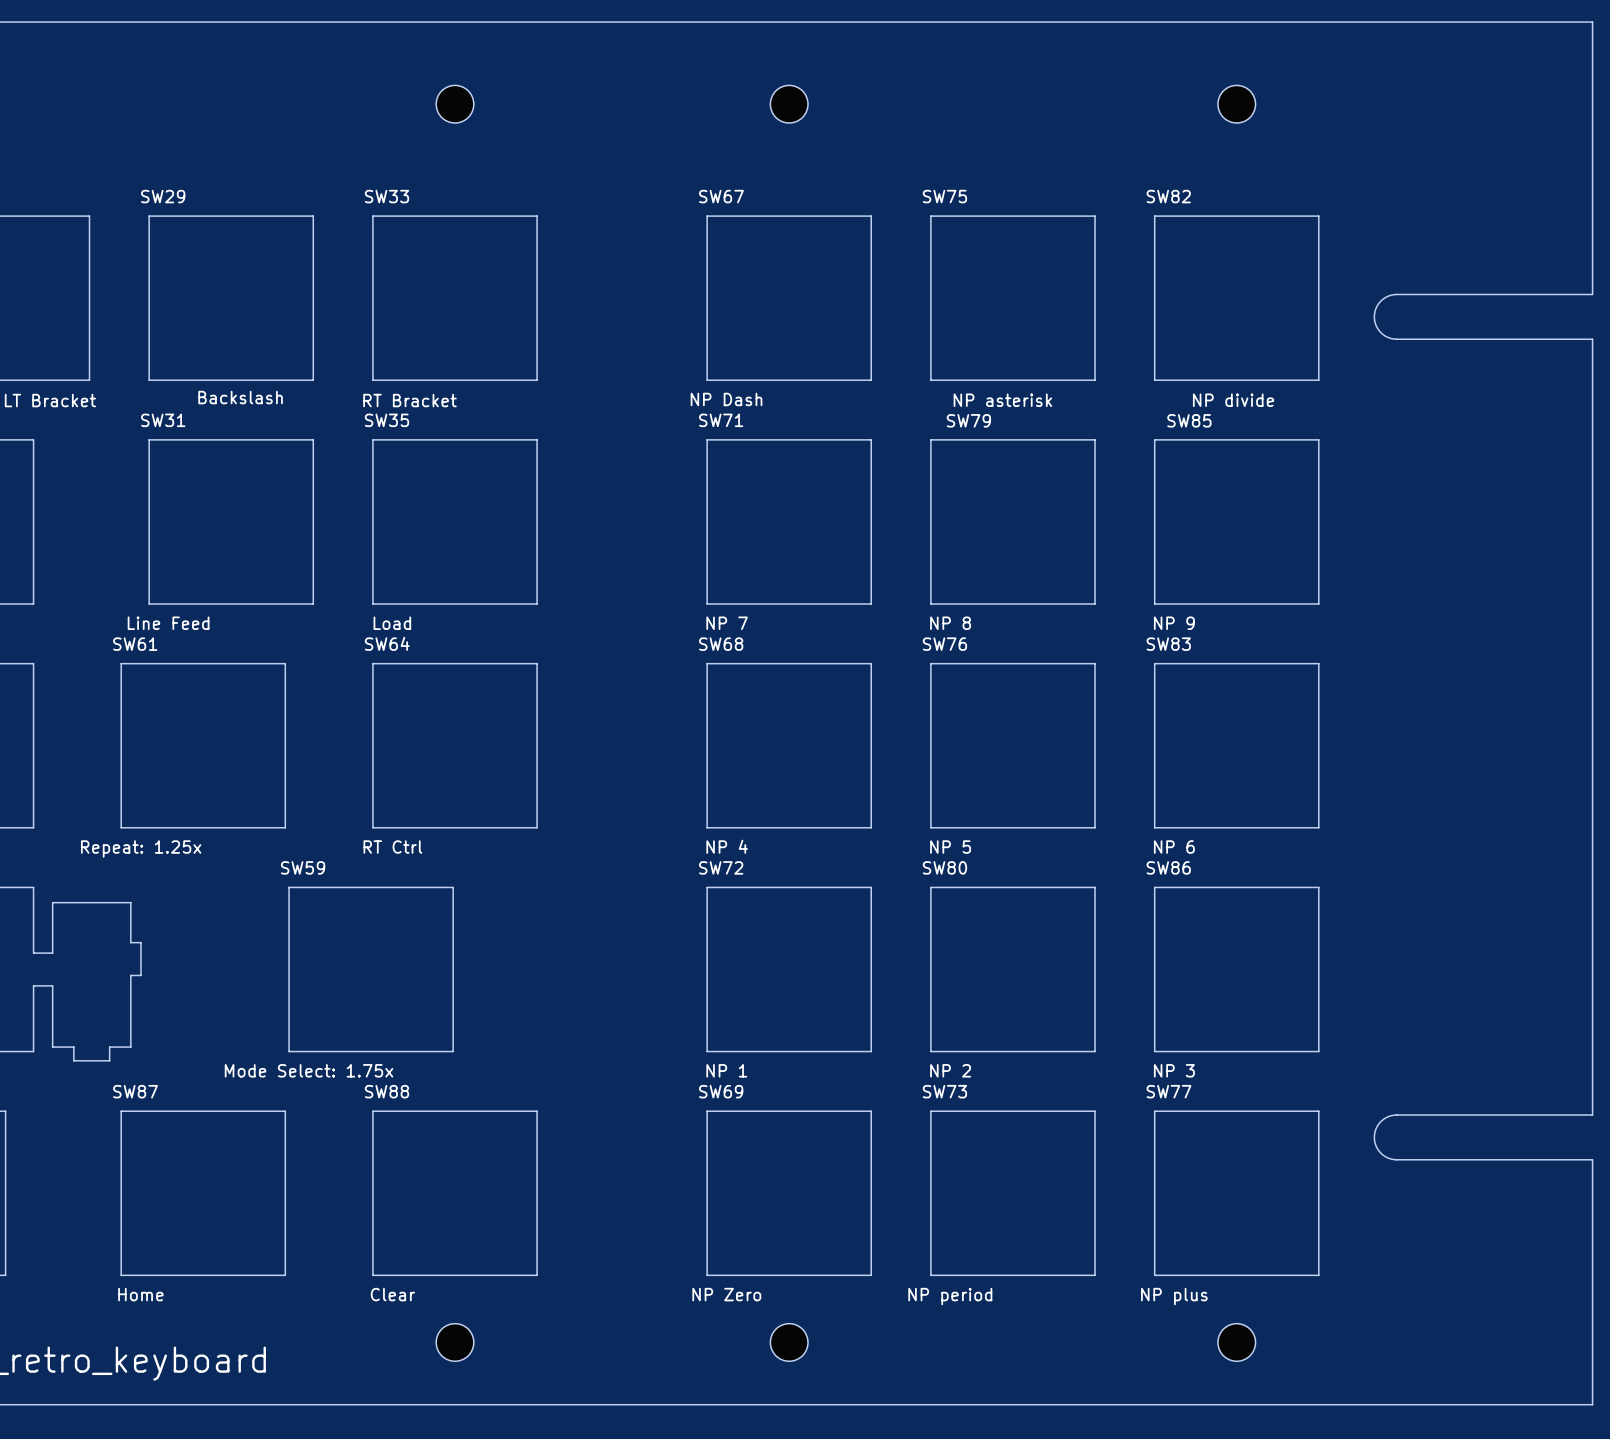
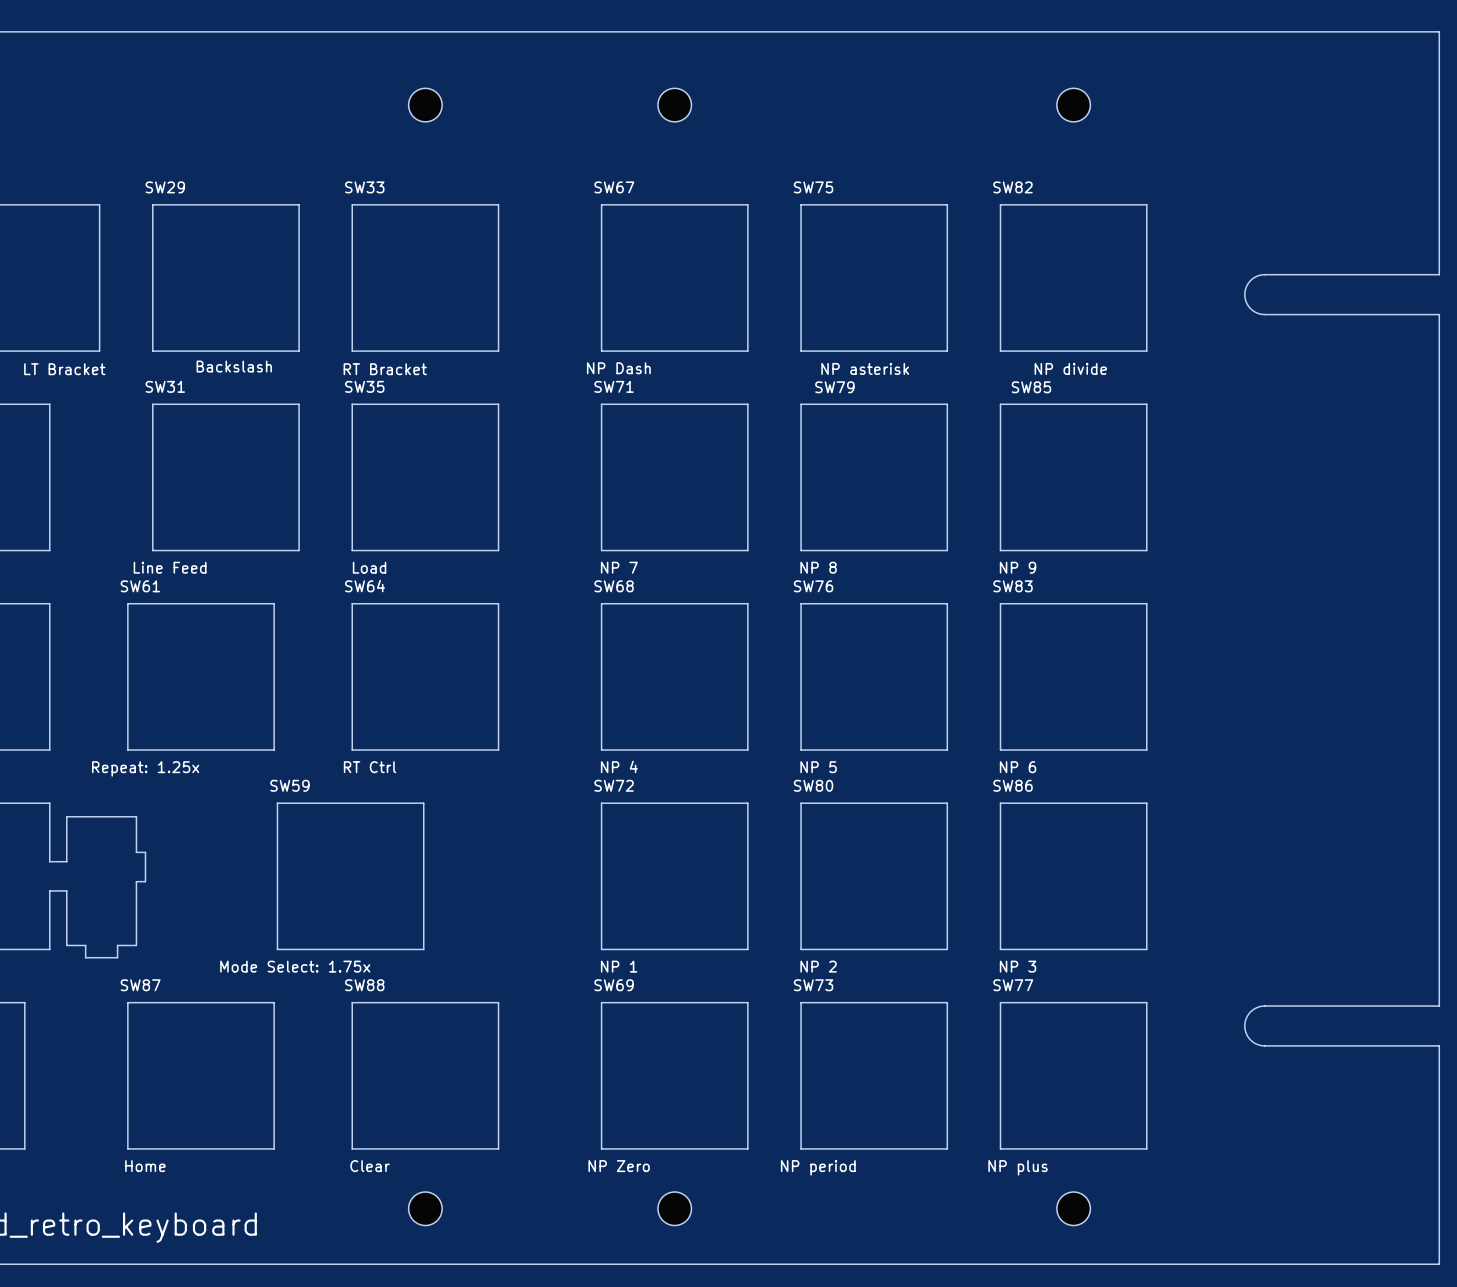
part position: (789, 104) -> (674, 105)
part position: (1236, 104) -> (1073, 105)
SW67 position: (789, 298) -> (674, 277)
SW75 position: (1012, 298) -> (874, 277)
SW82 position: (1236, 298) -> (1073, 277)
SW71 position: (789, 521) -> (674, 477)
SW79 position: (1012, 521) -> (874, 477)
SW85 position: (1236, 521) -> (1073, 477)
SW68 position: (789, 745) -> (674, 676)
SW76 position: (1012, 745) -> (874, 676)
SW83 position: (1236, 745) -> (1073, 676)
SW72 position: (789, 969) -> (674, 876)
SW80 position: (1012, 969) -> (874, 876)
SW86 position: (1236, 969) -> (1073, 876)
SW69 position: (789, 1193) -> (674, 1075)
SW73 position: (1012, 1193) -> (874, 1075)
SW77 position: (1236, 1193) -> (1073, 1075)
part position: (789, 1342) -> (674, 1208)
part position: (1236, 1342) -> (1073, 1208)

